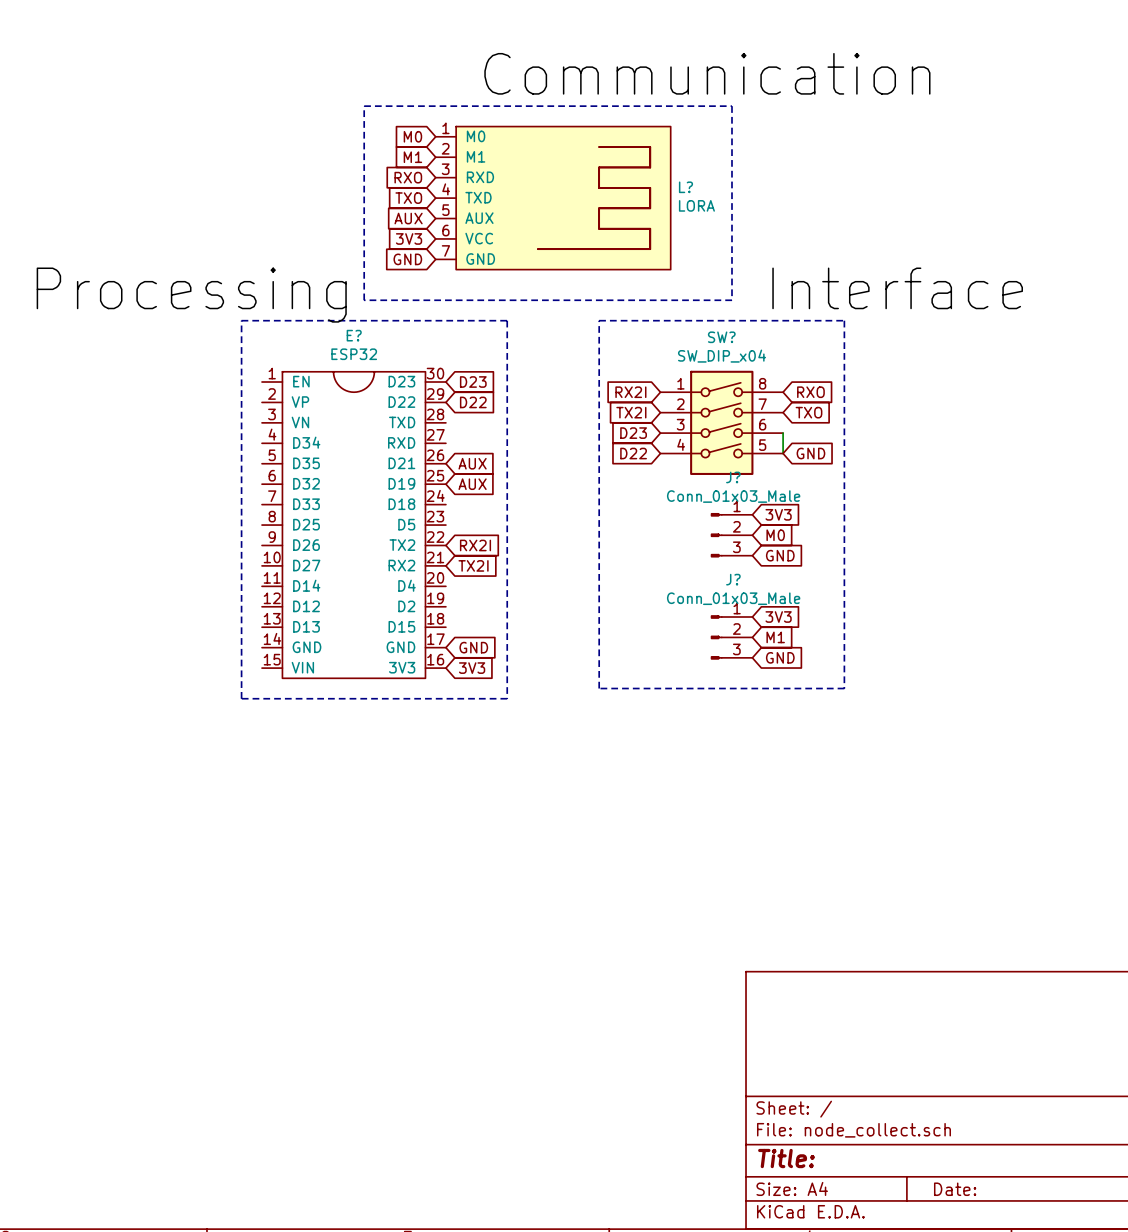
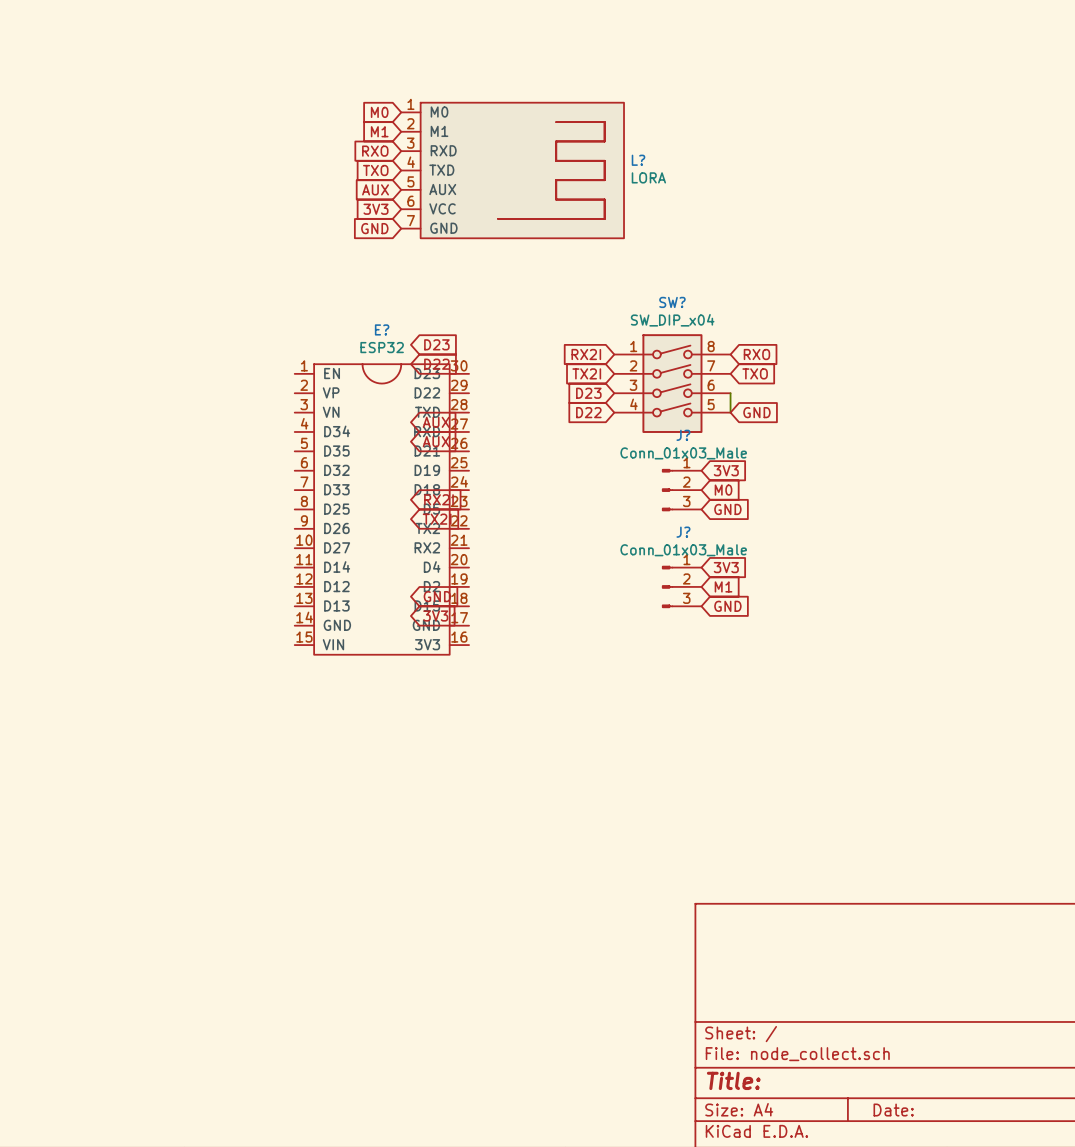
label: Communication (707, 73) -> none
line: (364, 106) (731, 106) (731, 300) (364, 300) (364, 106) -> none
label: Interface (897, 288) -> none
label: Processing (191, 295) -> none
line: (241, 320) (507, 320) (507, 698) (241, 698) (241, 320) -> none
line: (599, 320) (844, 320) (844, 688) (599, 688) (599, 320) -> none
E? position: (353, 525) -> (381, 509)

